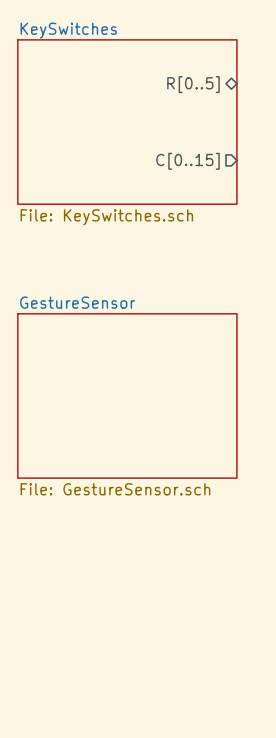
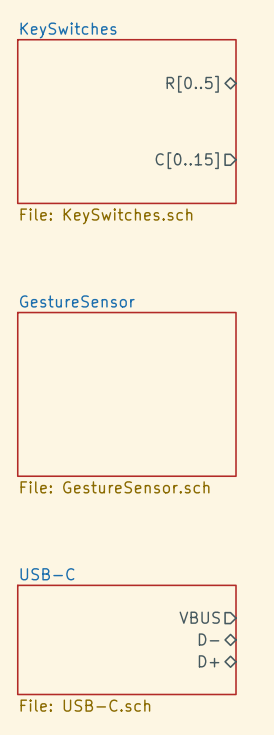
sheet pin: none -> VBUS (199, 617)
sheet USB-C: none -> File: USB-C.sch (126, 639)
sheet pin: none -> D- (209, 639)
sheet pin: none -> D+ (209, 661)

